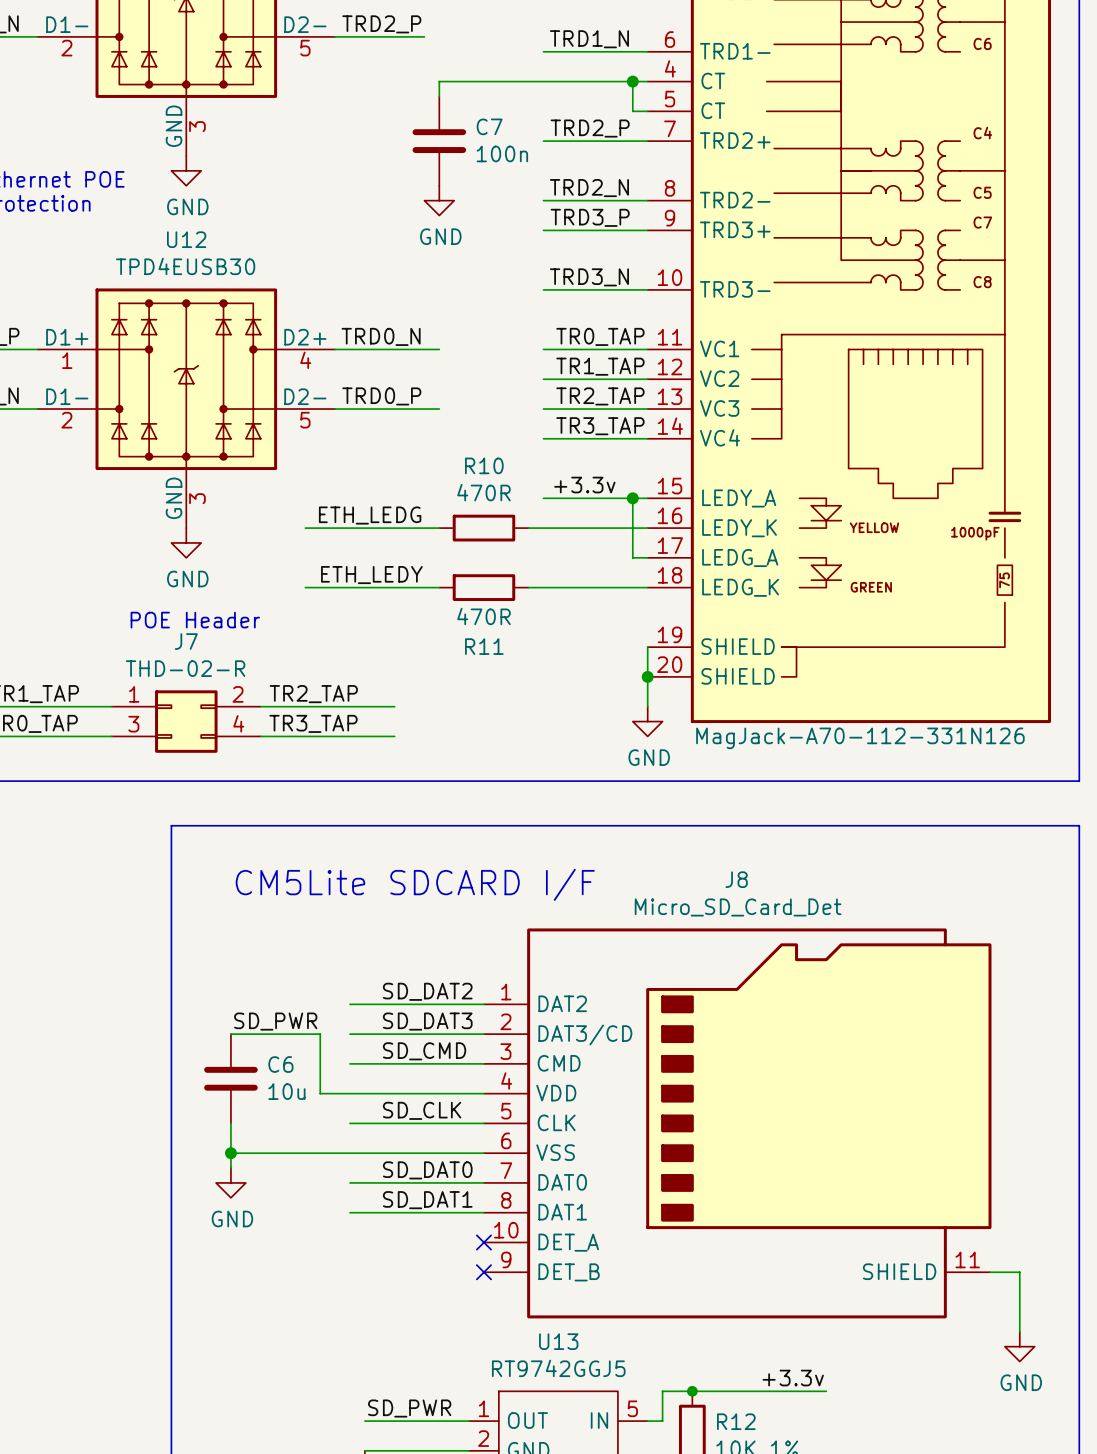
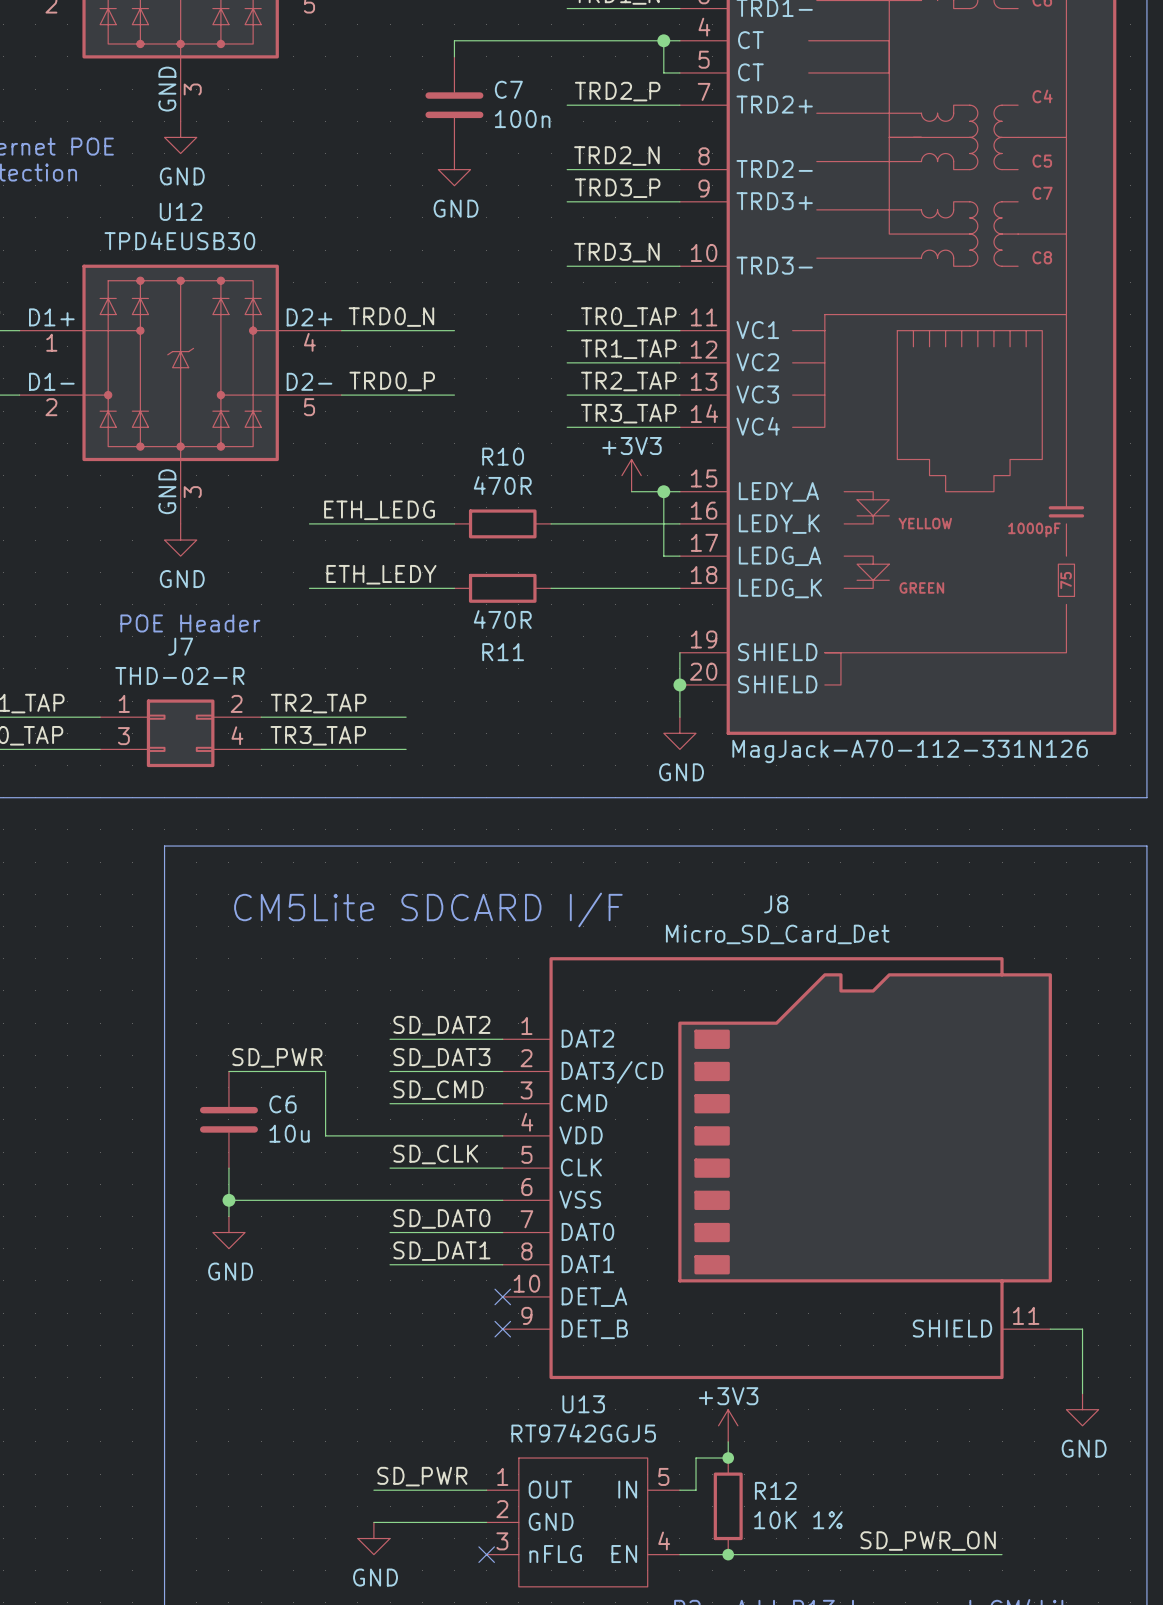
power symbol: none -> +3V3 (631, 475)
label: +3.3v (584, 485) -> none
wire: (543, 498) (603, 498) -> none
wire: (350, 1004) (379, 1004) -> none
wire: (350, 1034) (379, 1034) -> none
wire: (350, 1063) (379, 1063) -> none
wire: (350, 1123) (379, 1123) -> none
wire: (350, 1182) (379, 1182) -> none
wire: (350, 1212) (379, 1212) -> none
power symbol: none -> +3V3 (728, 1425)
label: +3.3v (793, 1378) -> none
wire: (692, 1391) (826, 1391) -> (728, 1458) (728, 1441)

